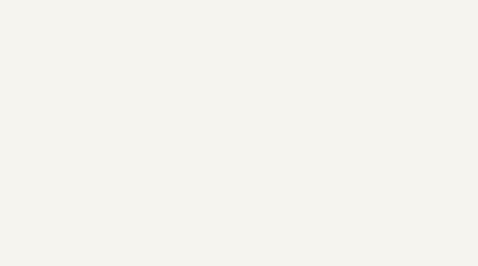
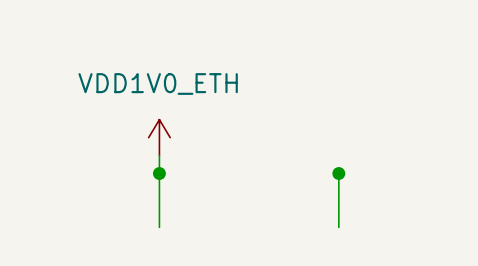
power symbol: none -> VDD1V0_ETH (159, 137)
wire: none -> (159, 155) (159, 227)
junction: none -> (159, 173)
wire: none -> (338, 173) (338, 227)
junction: none -> (338, 173)

